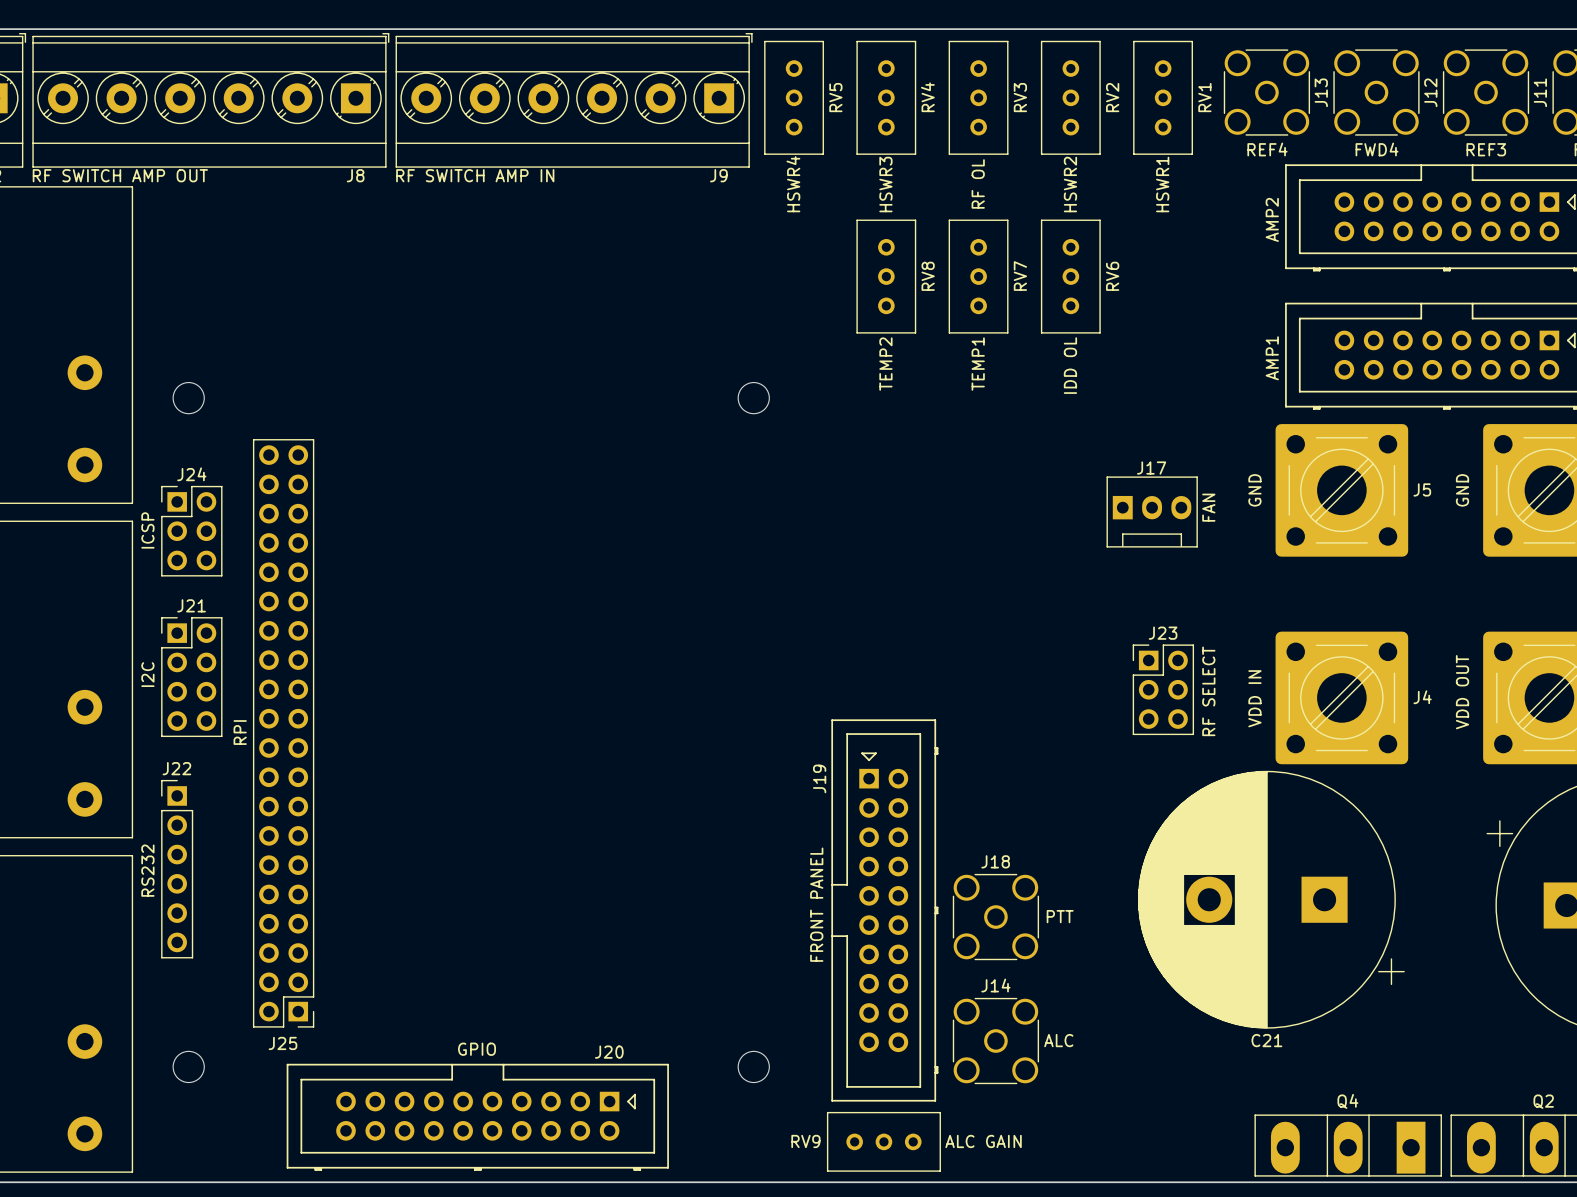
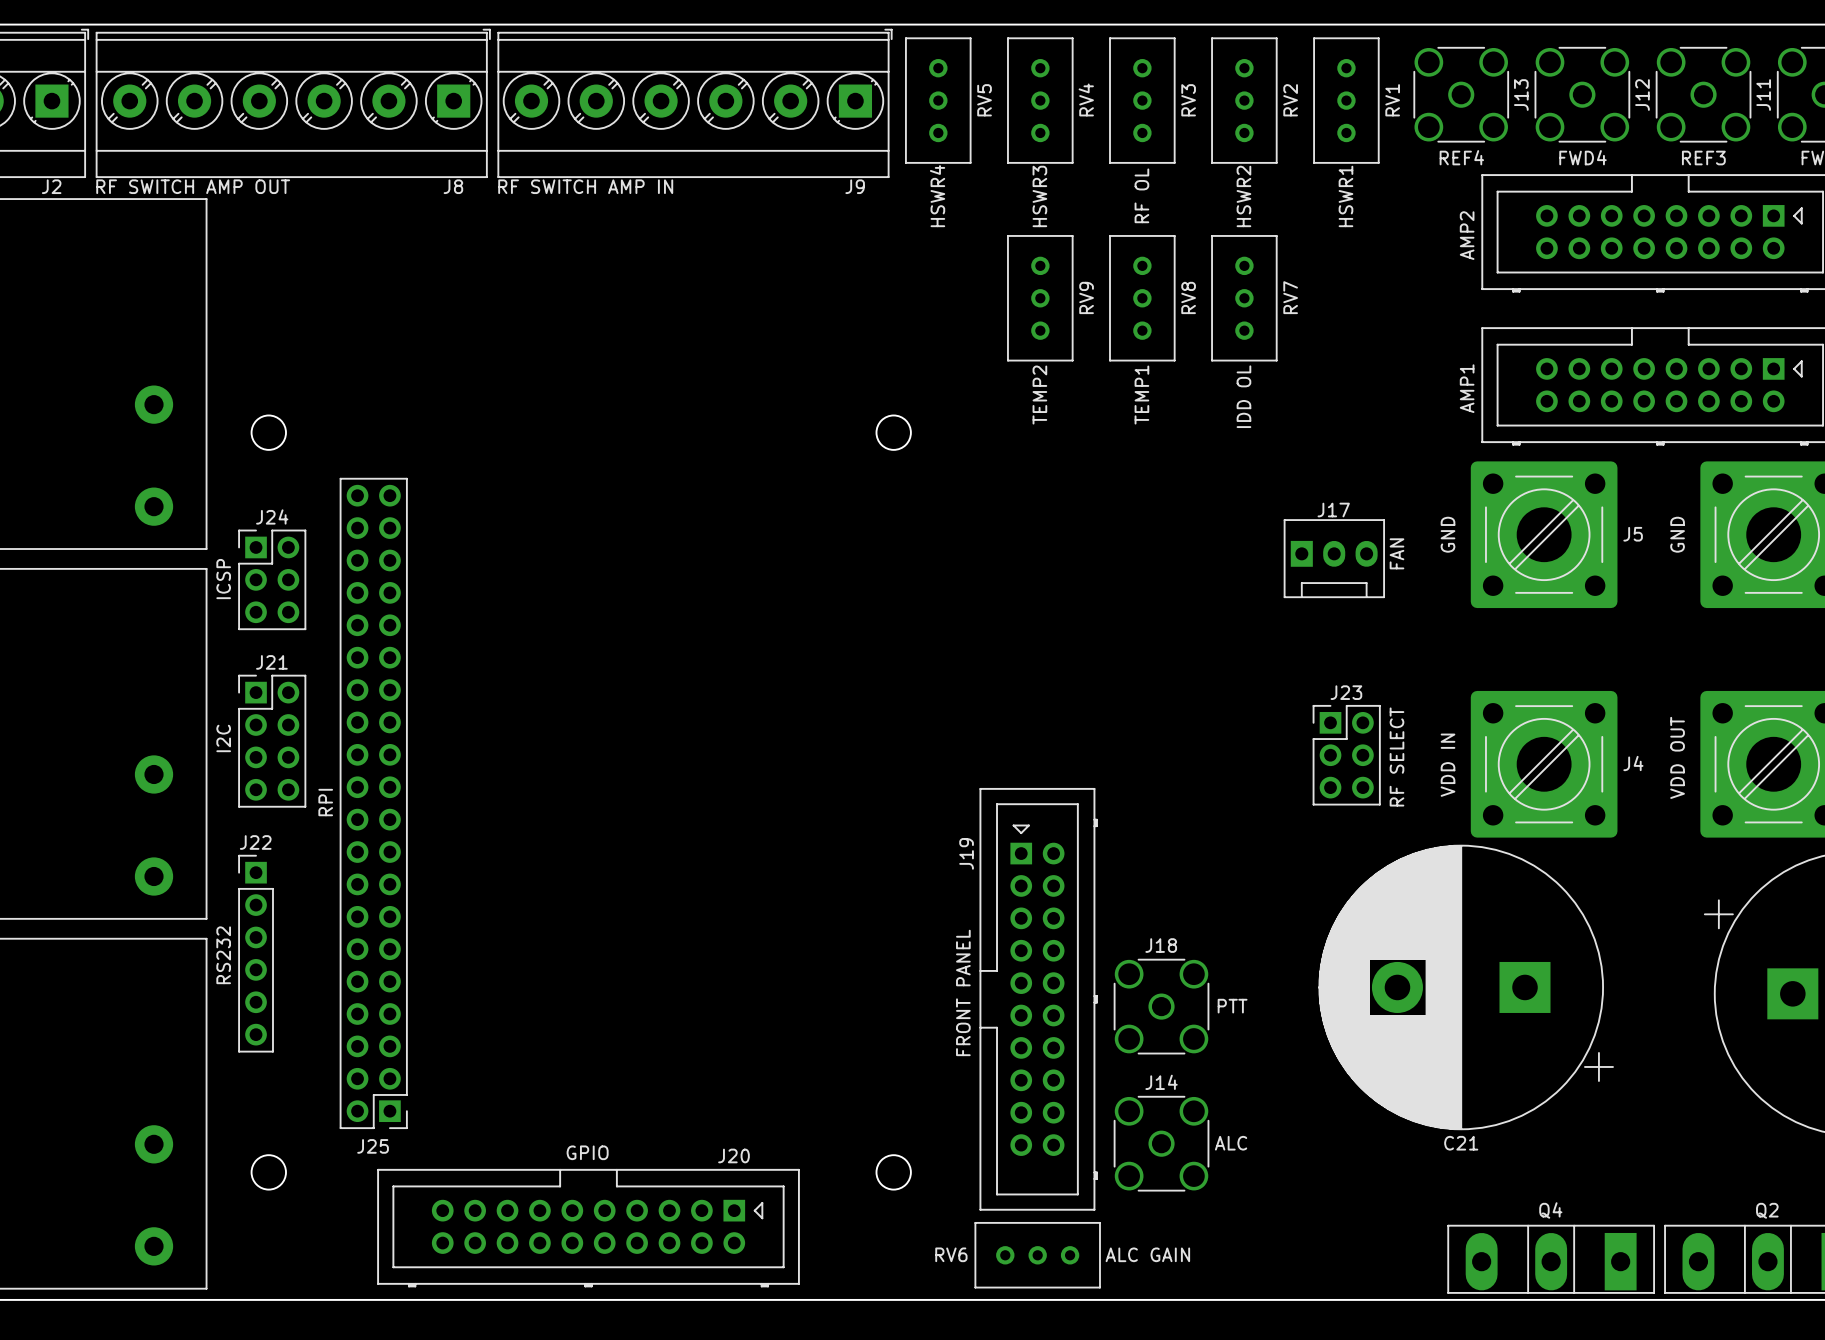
RV8 name: RV8 (928, 276) -> RV9 (1086, 297)
RV7 name: RV7 (1020, 276) -> RV8 (1188, 297)
RV6 name: RV6 (1112, 276) -> RV7 (1290, 297)
RV9 name: RV9 (805, 1141) -> RV6 (951, 1254)

